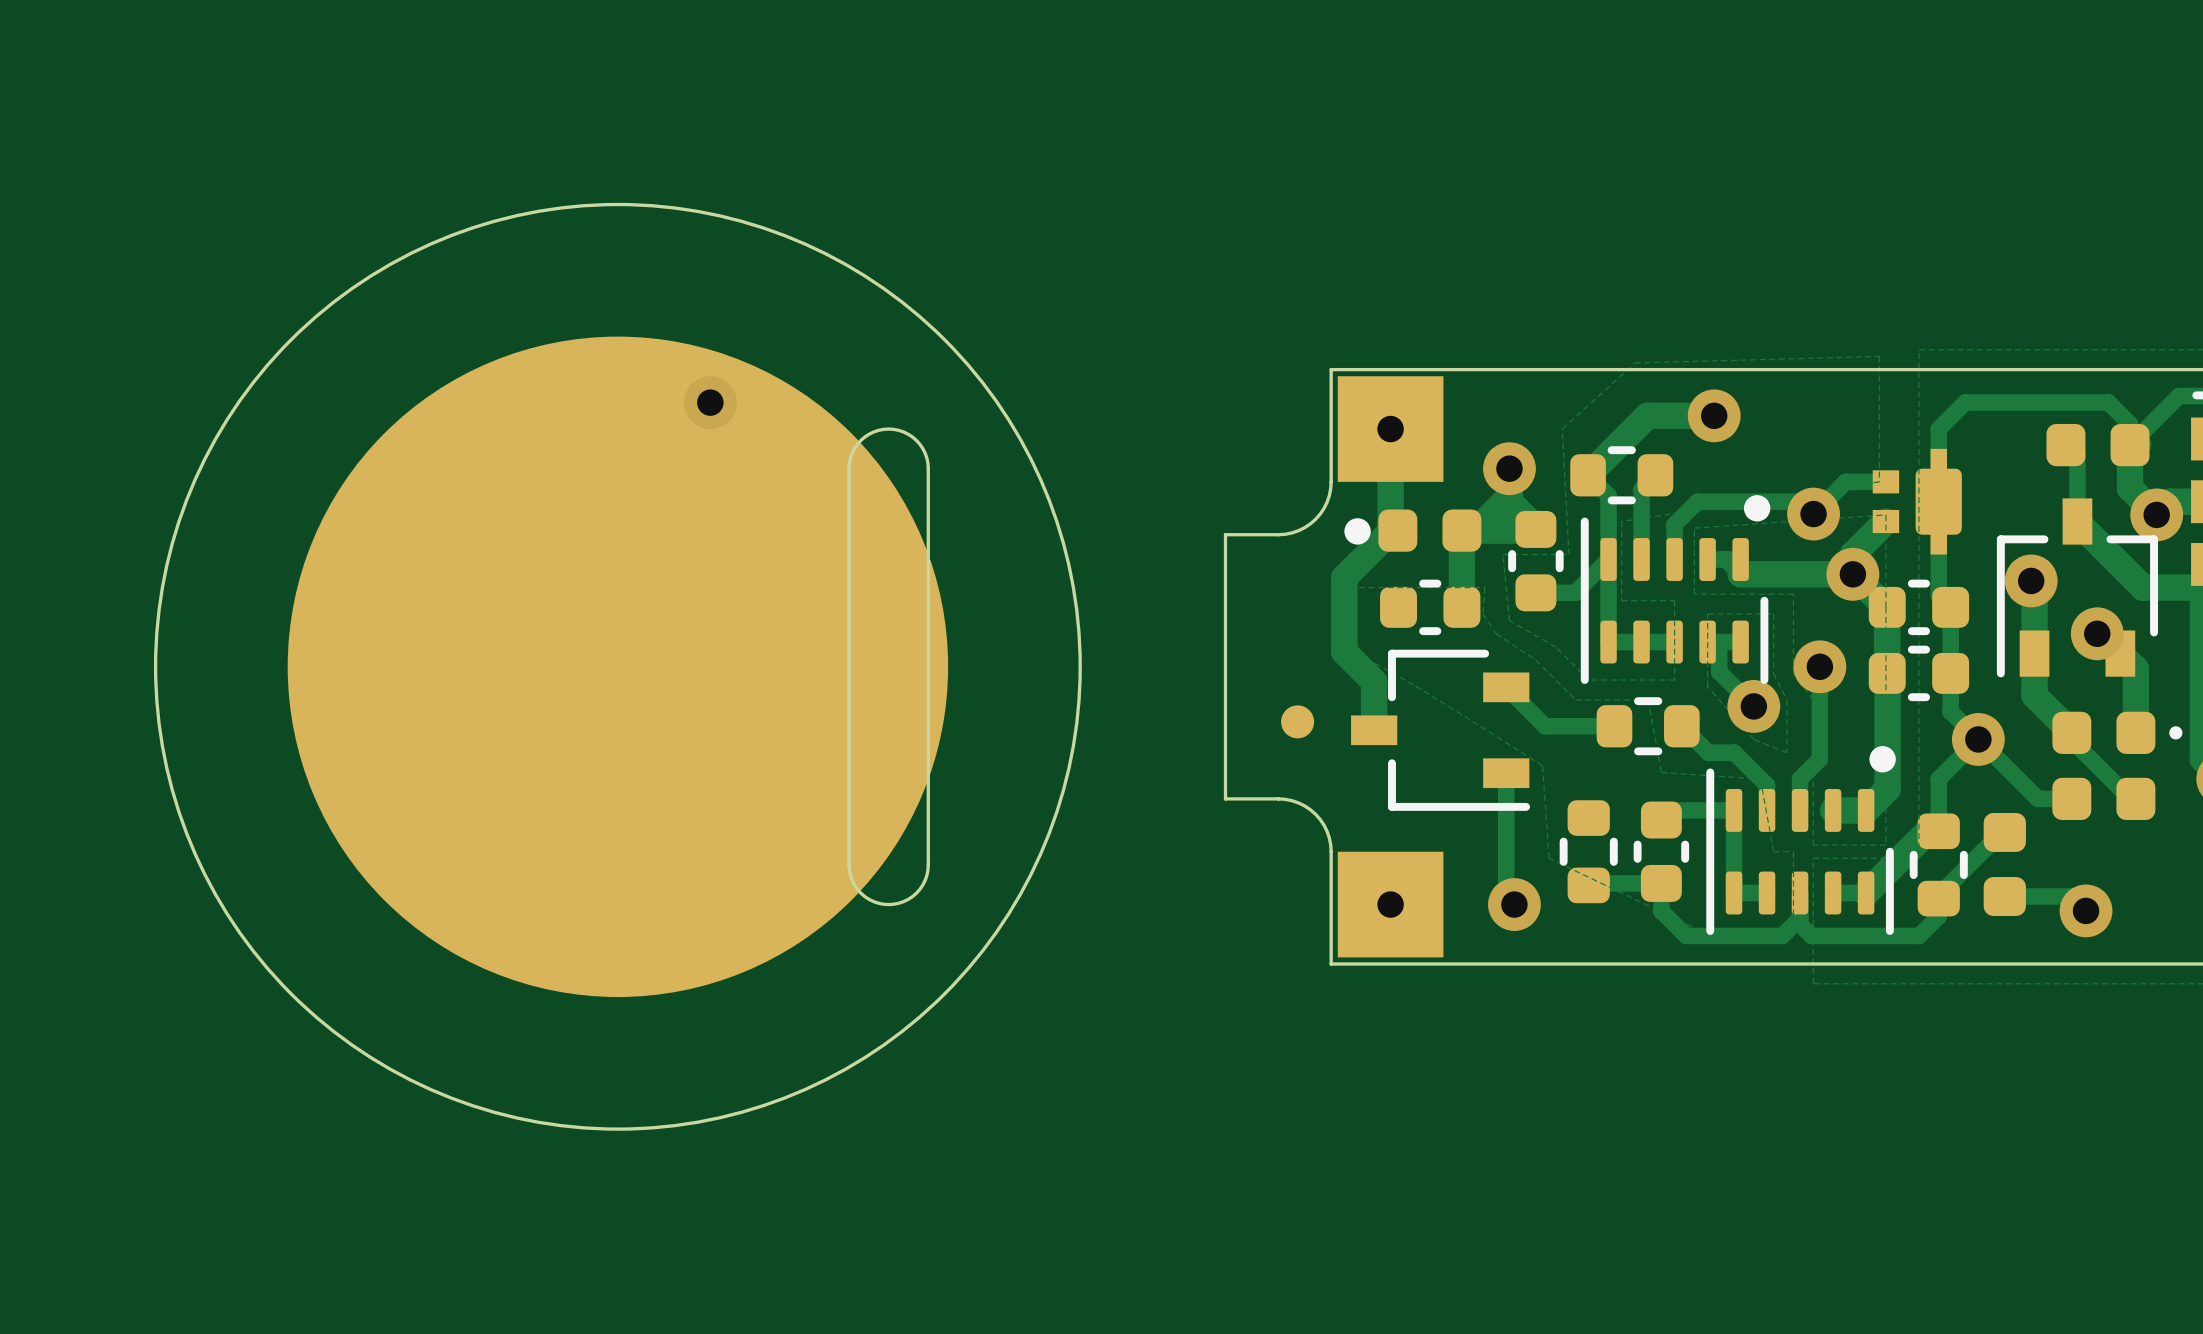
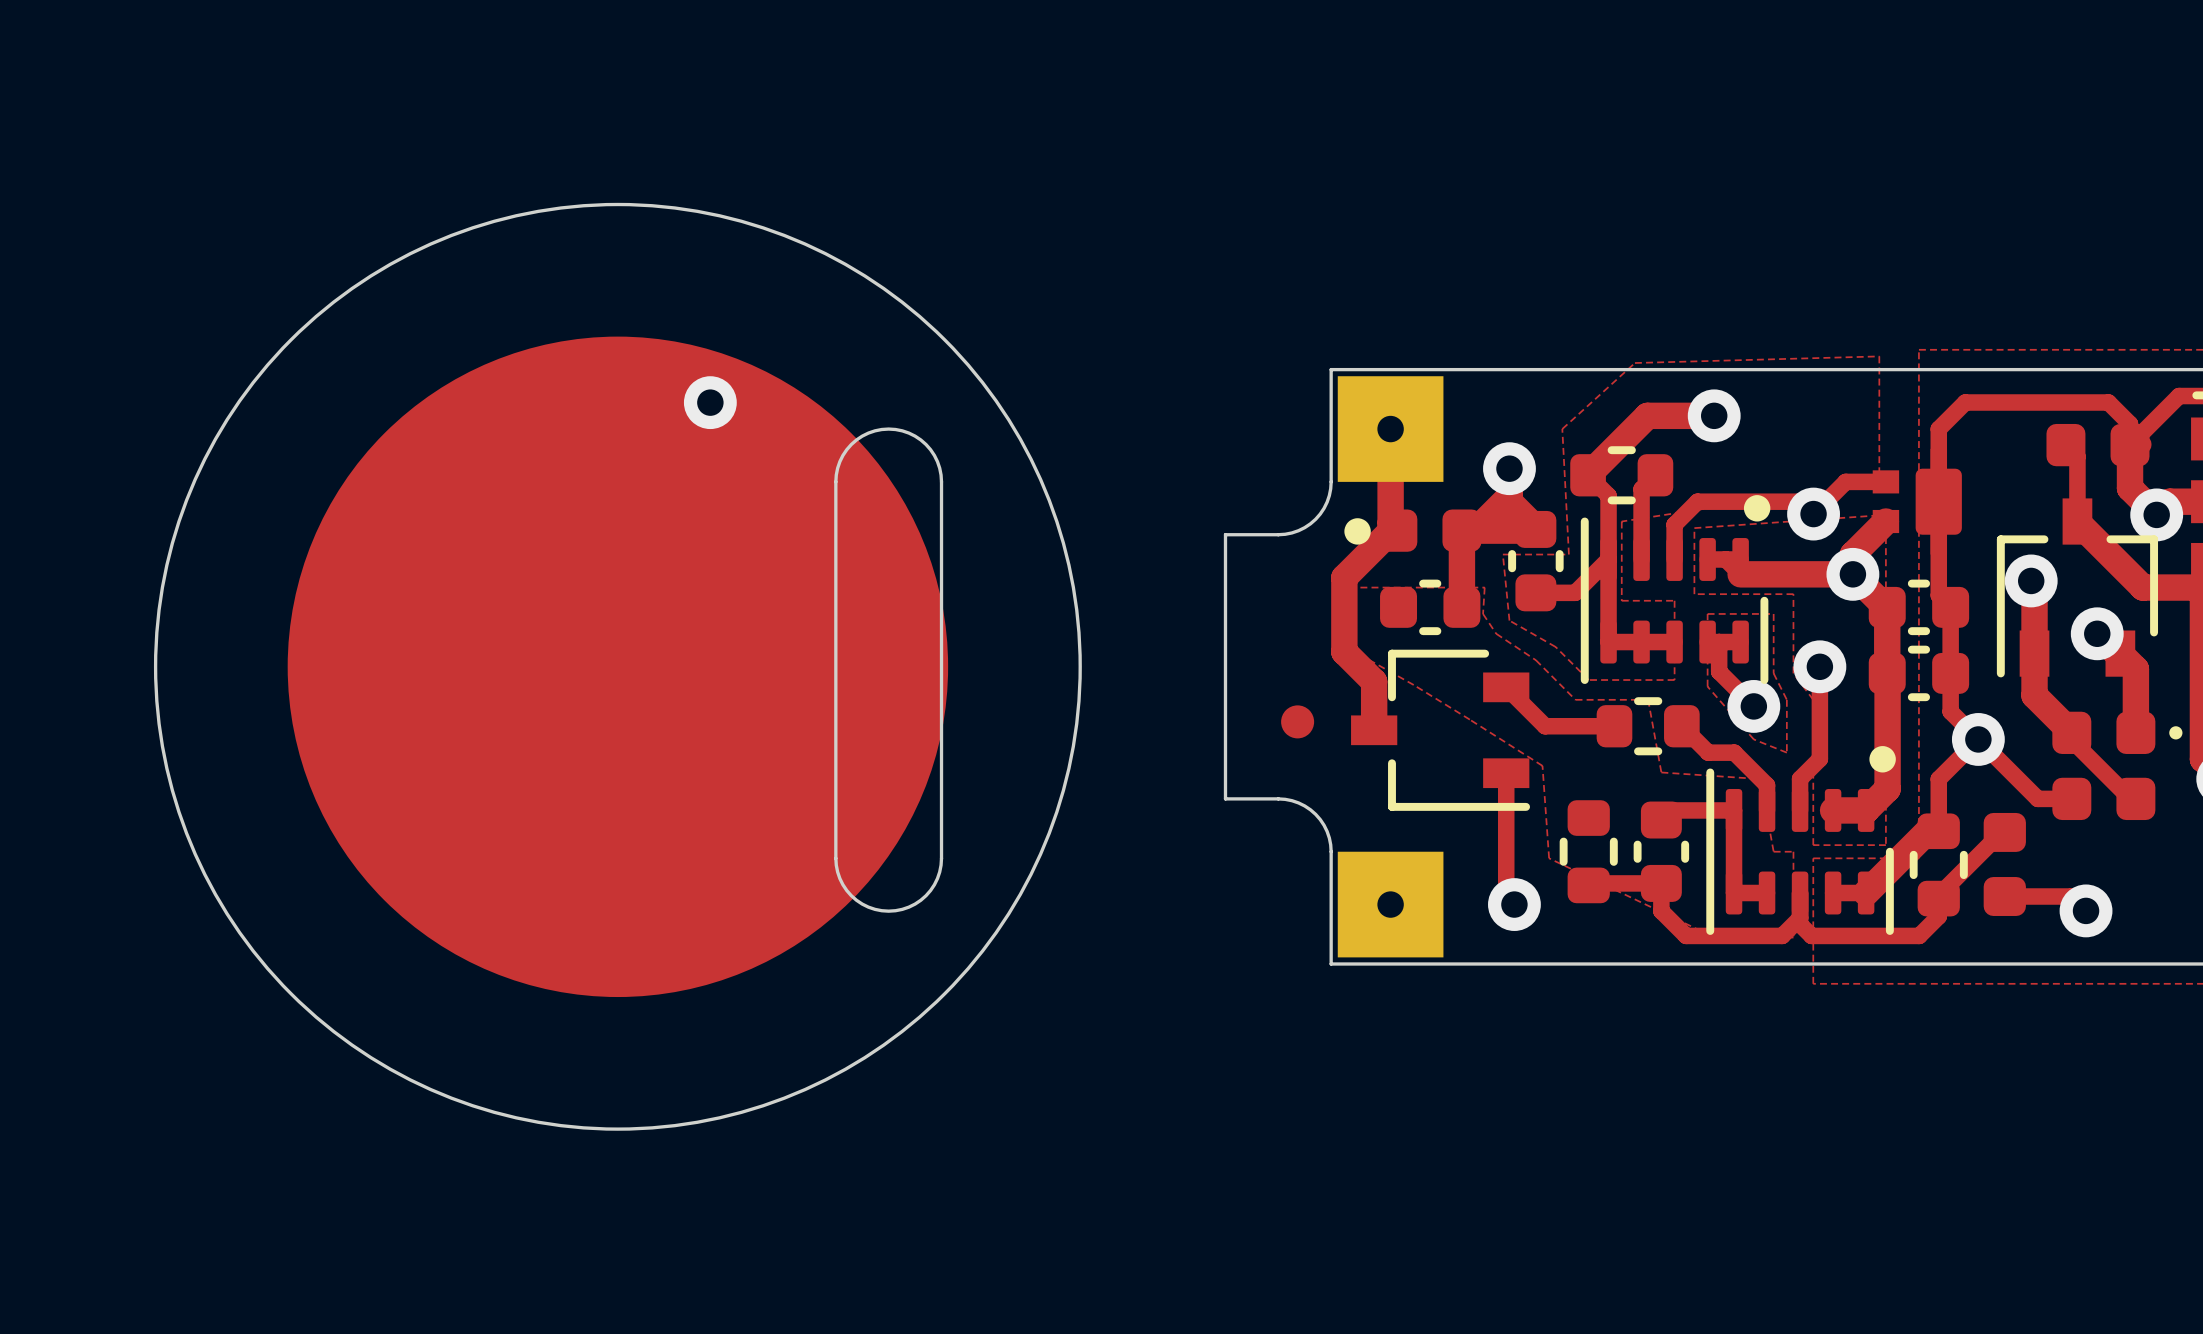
board edge: (849, 468) (849, 870) (854, 884) (864, 896) (878, 903) (893, 904) (908, 899) (916, 892) (922, 884) (927, 870) (927, 463) (922, 448) (912, 437) (898, 430) (883, 429) (868, 434) (857, 444) (852, 453) (849, 468) -> (835, 481) (836, 865) (842, 884) (856, 900) (875, 909) (895, 910) (915, 904) (926, 895) (937, 878) (941, 865) (941, 474) (937, 461) (926, 444) (908, 433) (888, 429) (868, 433) (851, 444) (839, 461) (835, 481)

